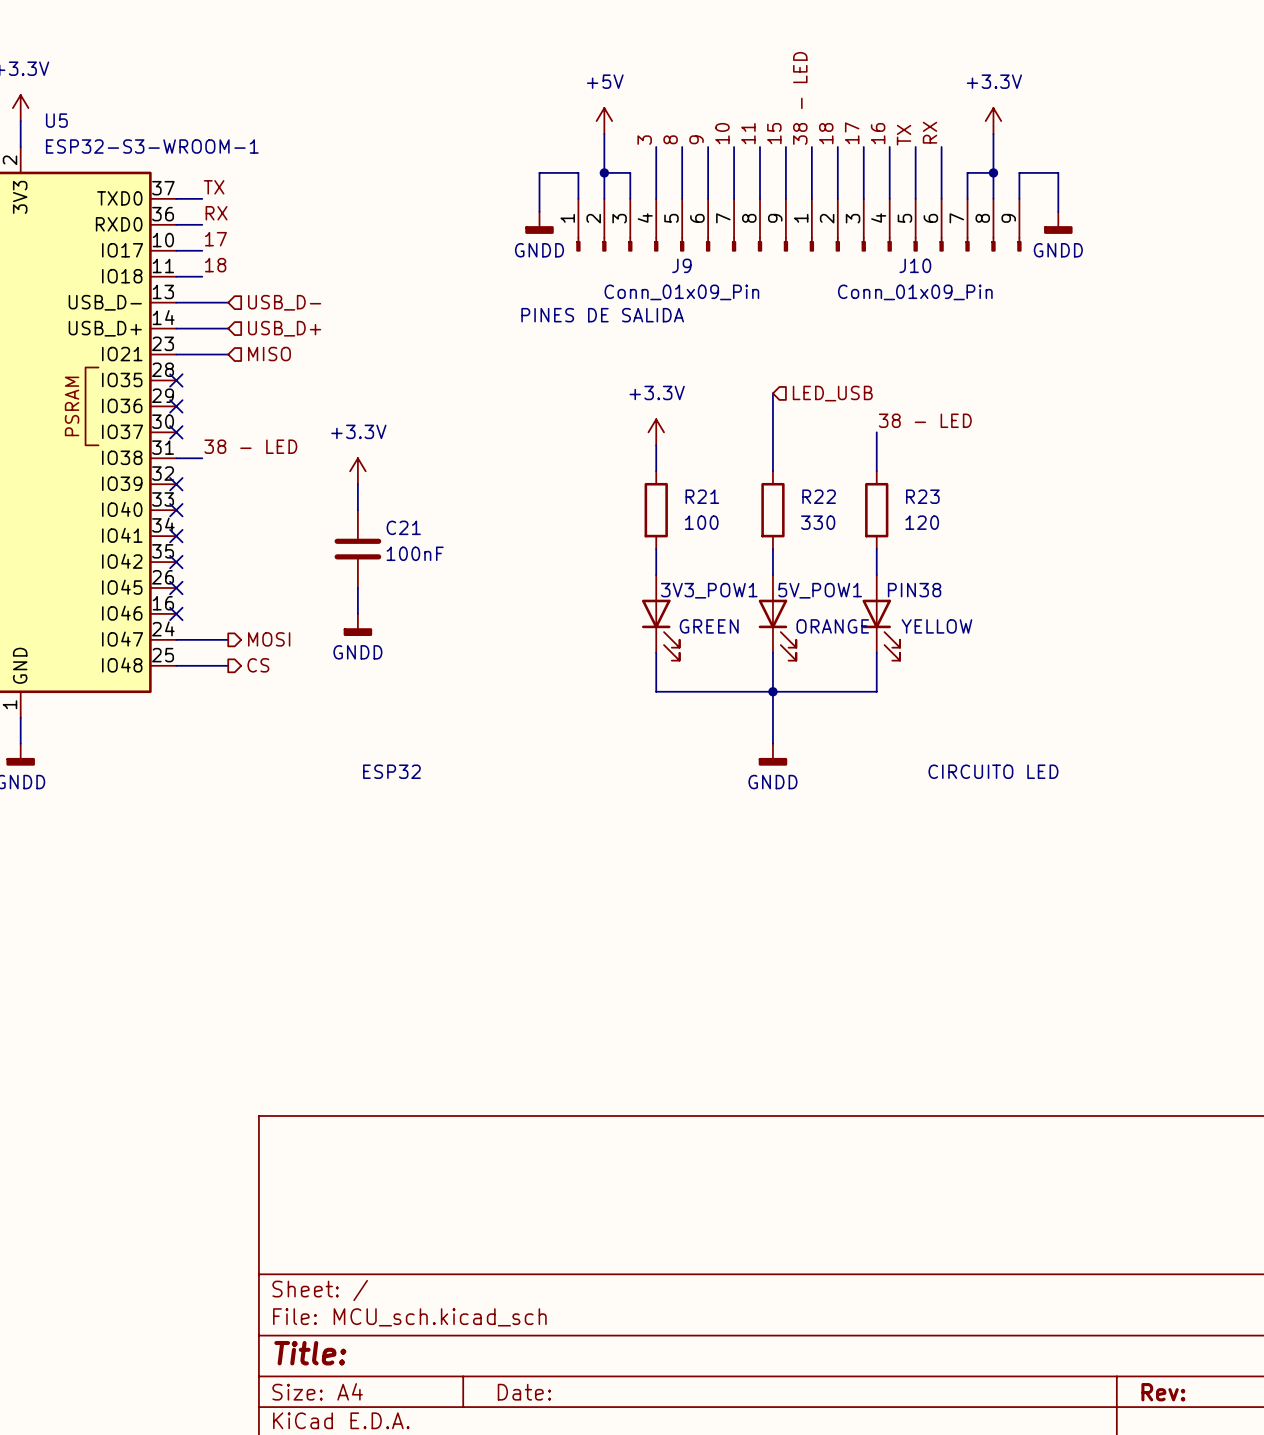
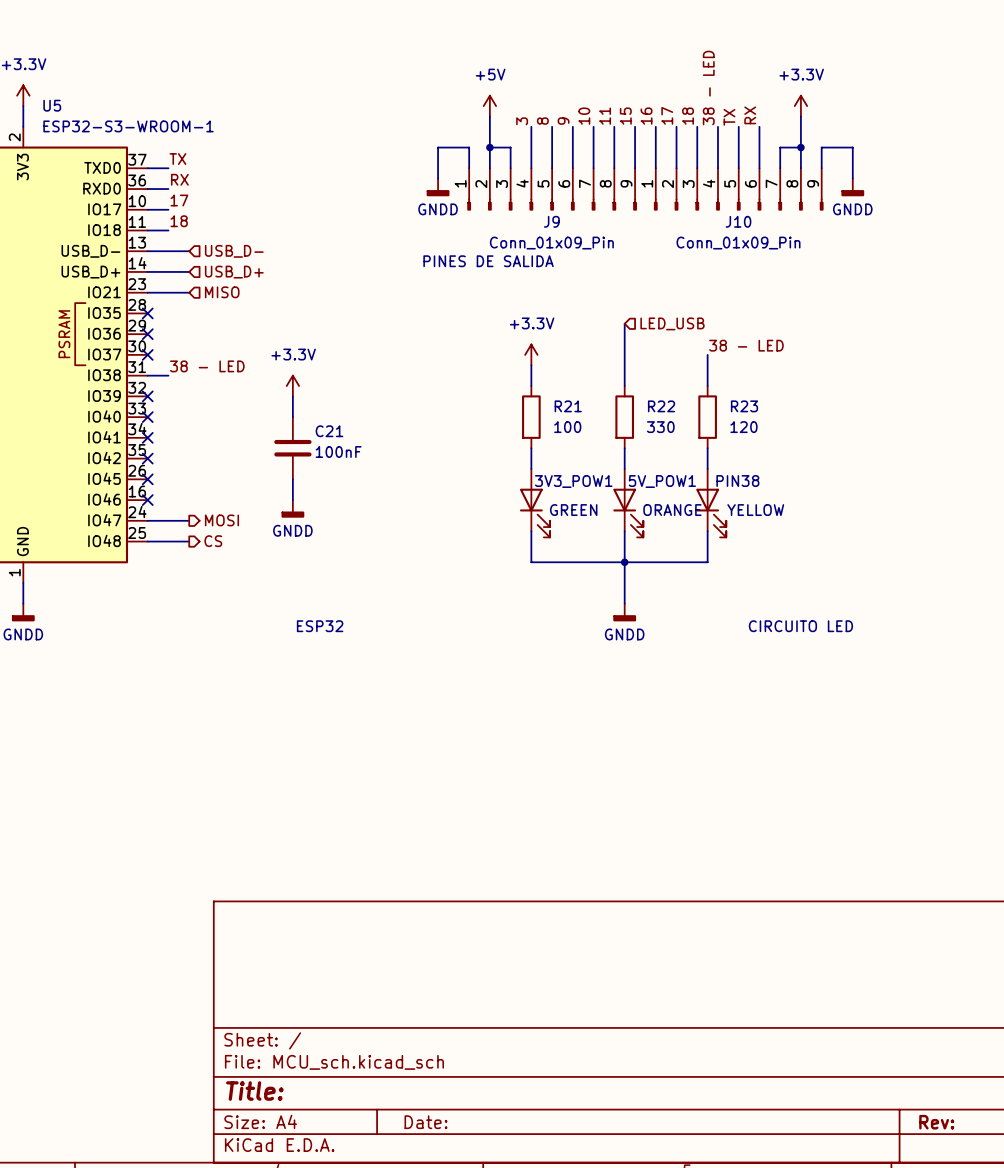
label: 38 - LED (800, 98) -> 16 (646, 116)
label: 18 (826, 133) -> 17 (667, 115)
label: 17 (852, 133) -> 18 (688, 116)
label: 16 (878, 133) -> 38 - LED (708, 87)

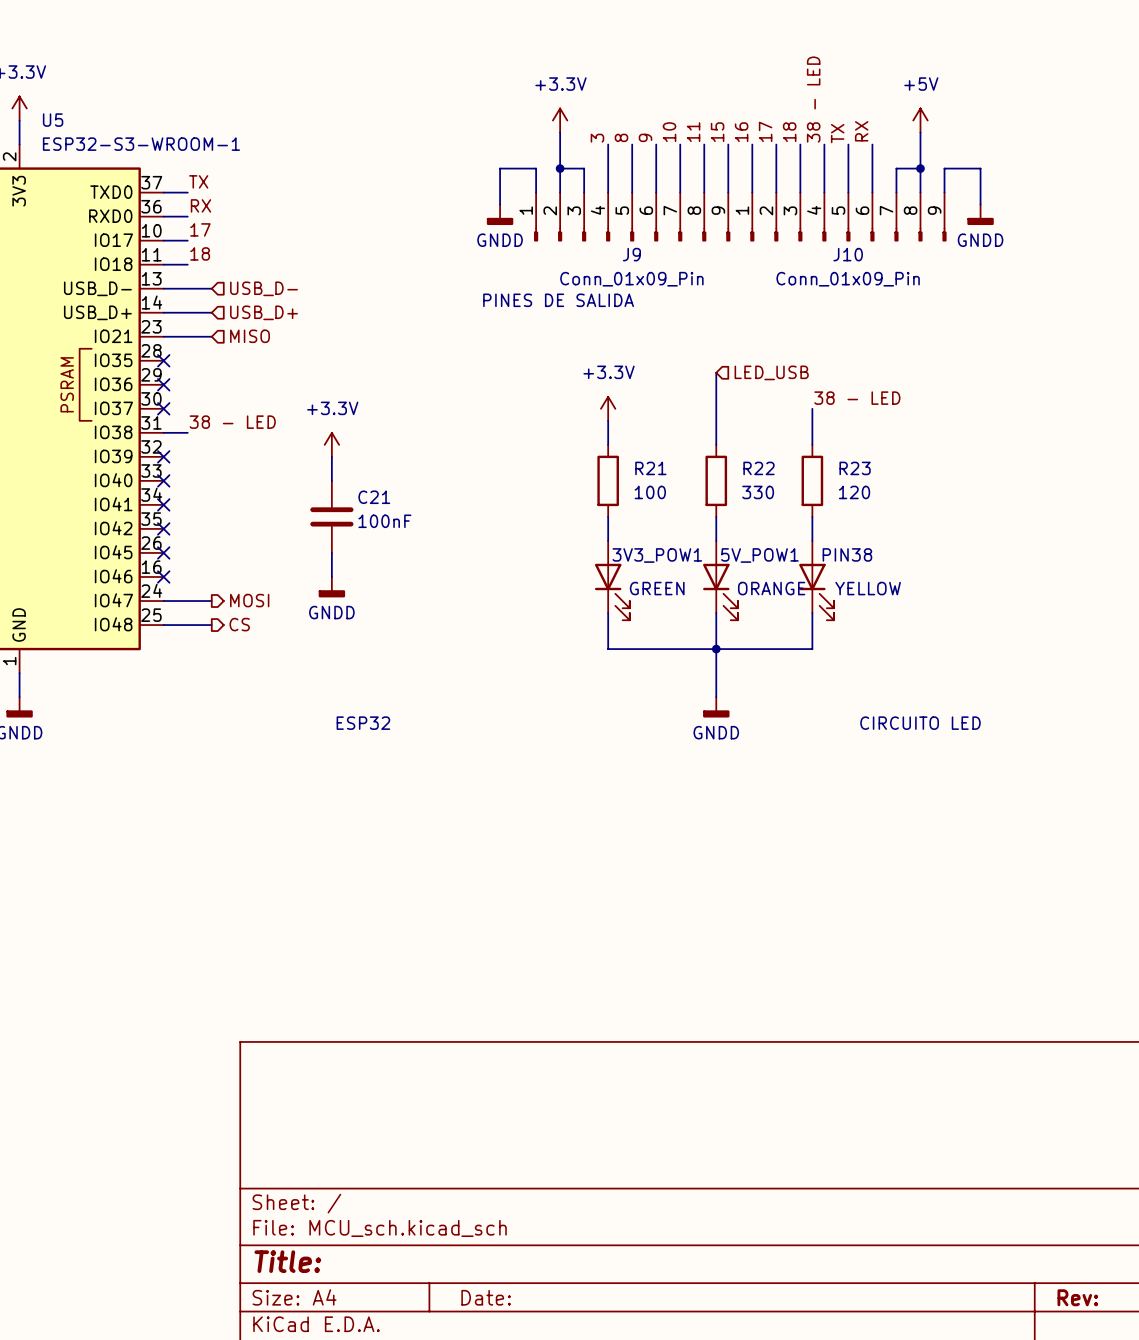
power symbol: +5V (489, 106) -> +3.3V (560, 120)
power symbol: +3.3V (800, 106) -> +5V (920, 120)

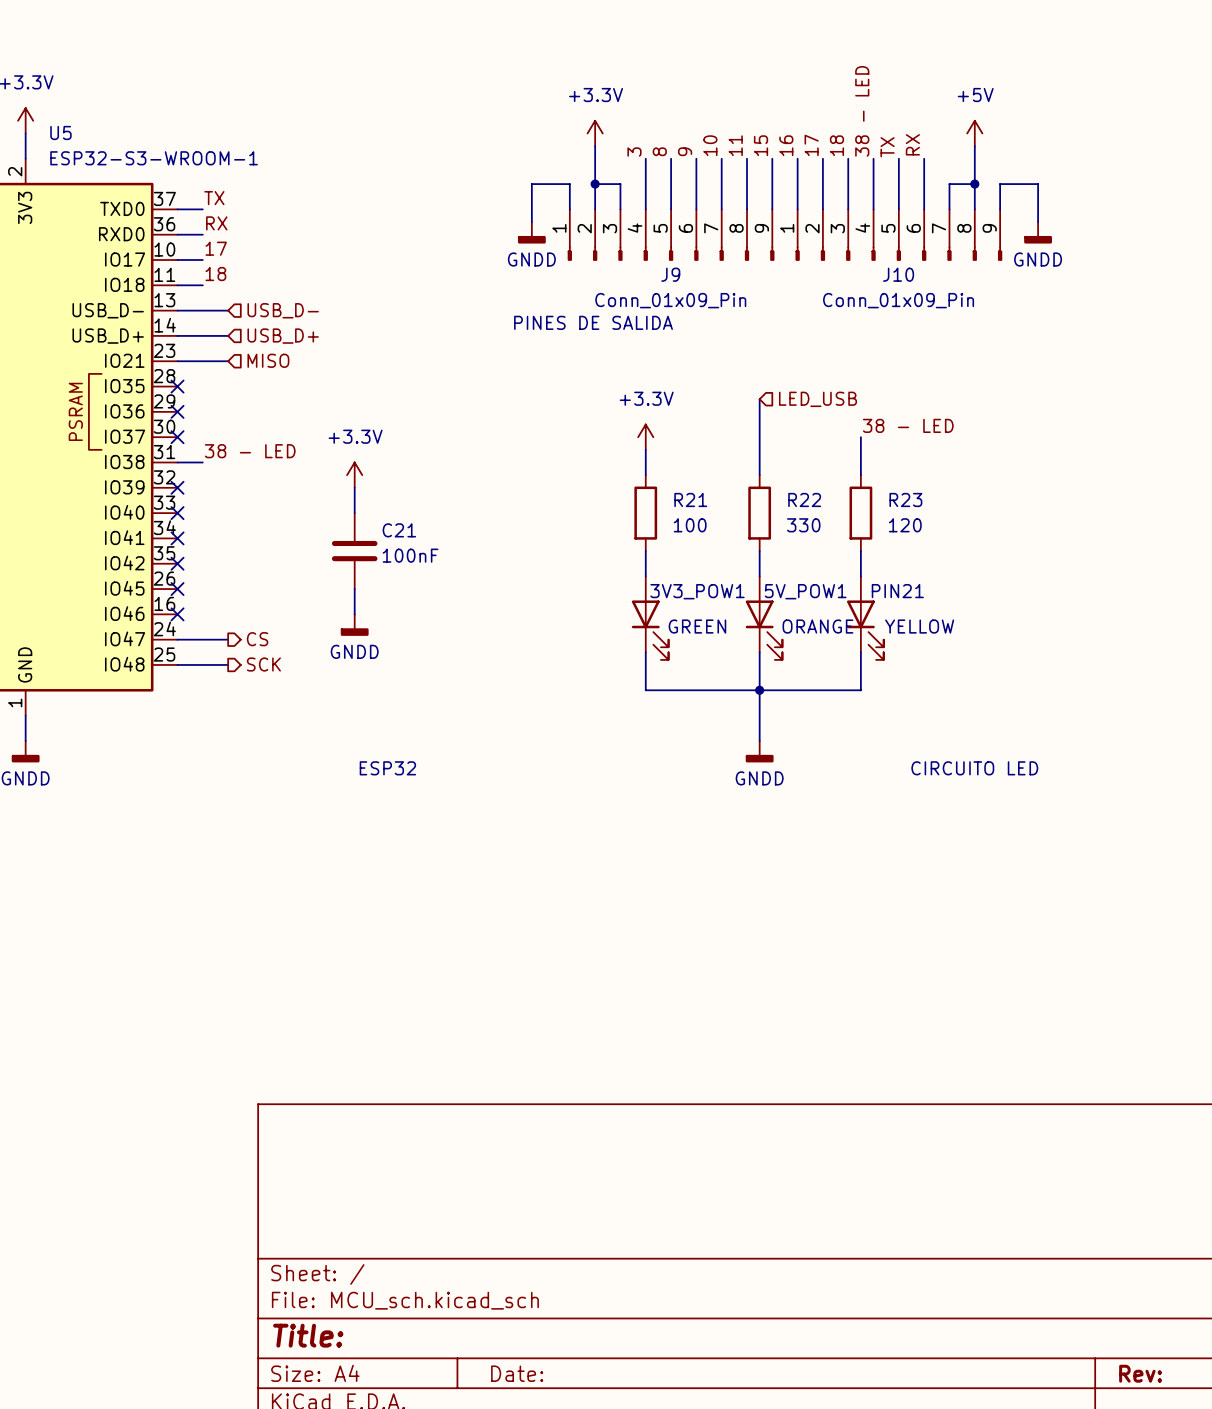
PIN38 name: PIN38 (847, 554) -> PIN21 (897, 591)
hierarchical label: MOSI (249, 600) -> CS (257, 639)
hierarchical label: CS (239, 624) -> SCK (263, 664)

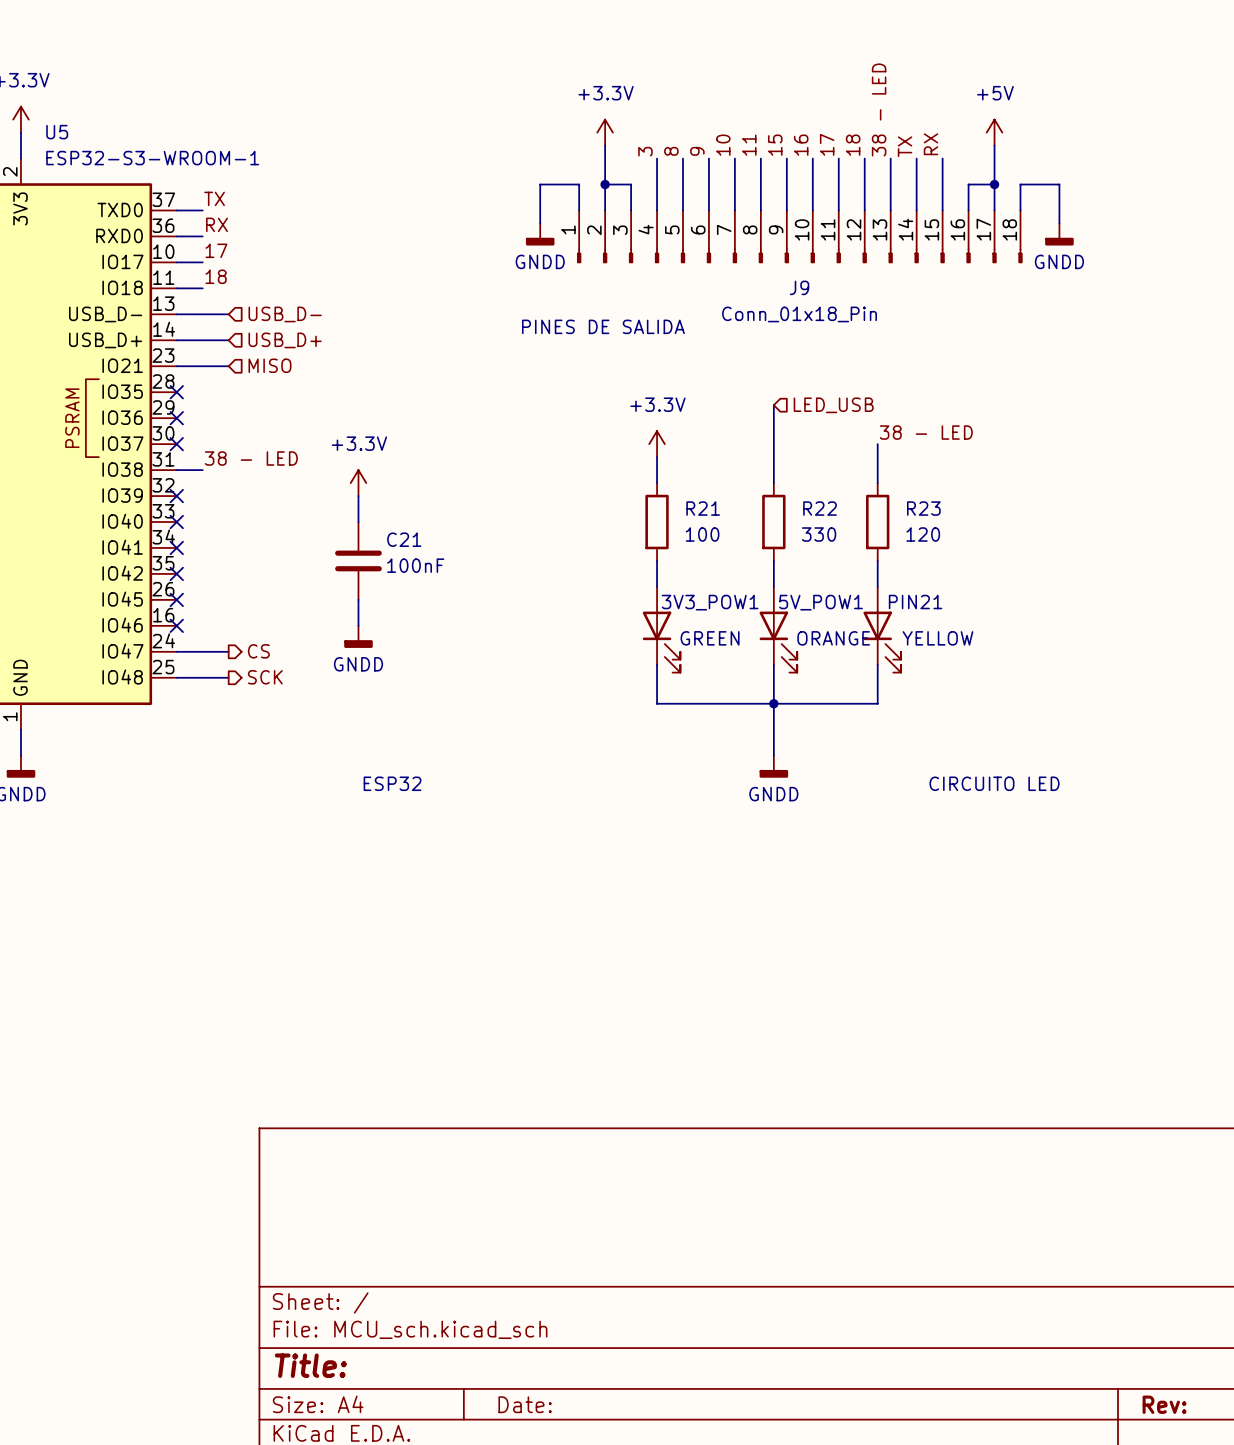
J9 symbol: [567, 209, 775, 261] -> [577, 210, 1023, 264]
J10: Conn_01x09_Pin (898, 235) -> none
J9 value: Conn_01x09_Pin (670, 300) -> Conn_01x18_Pin (799, 314)

